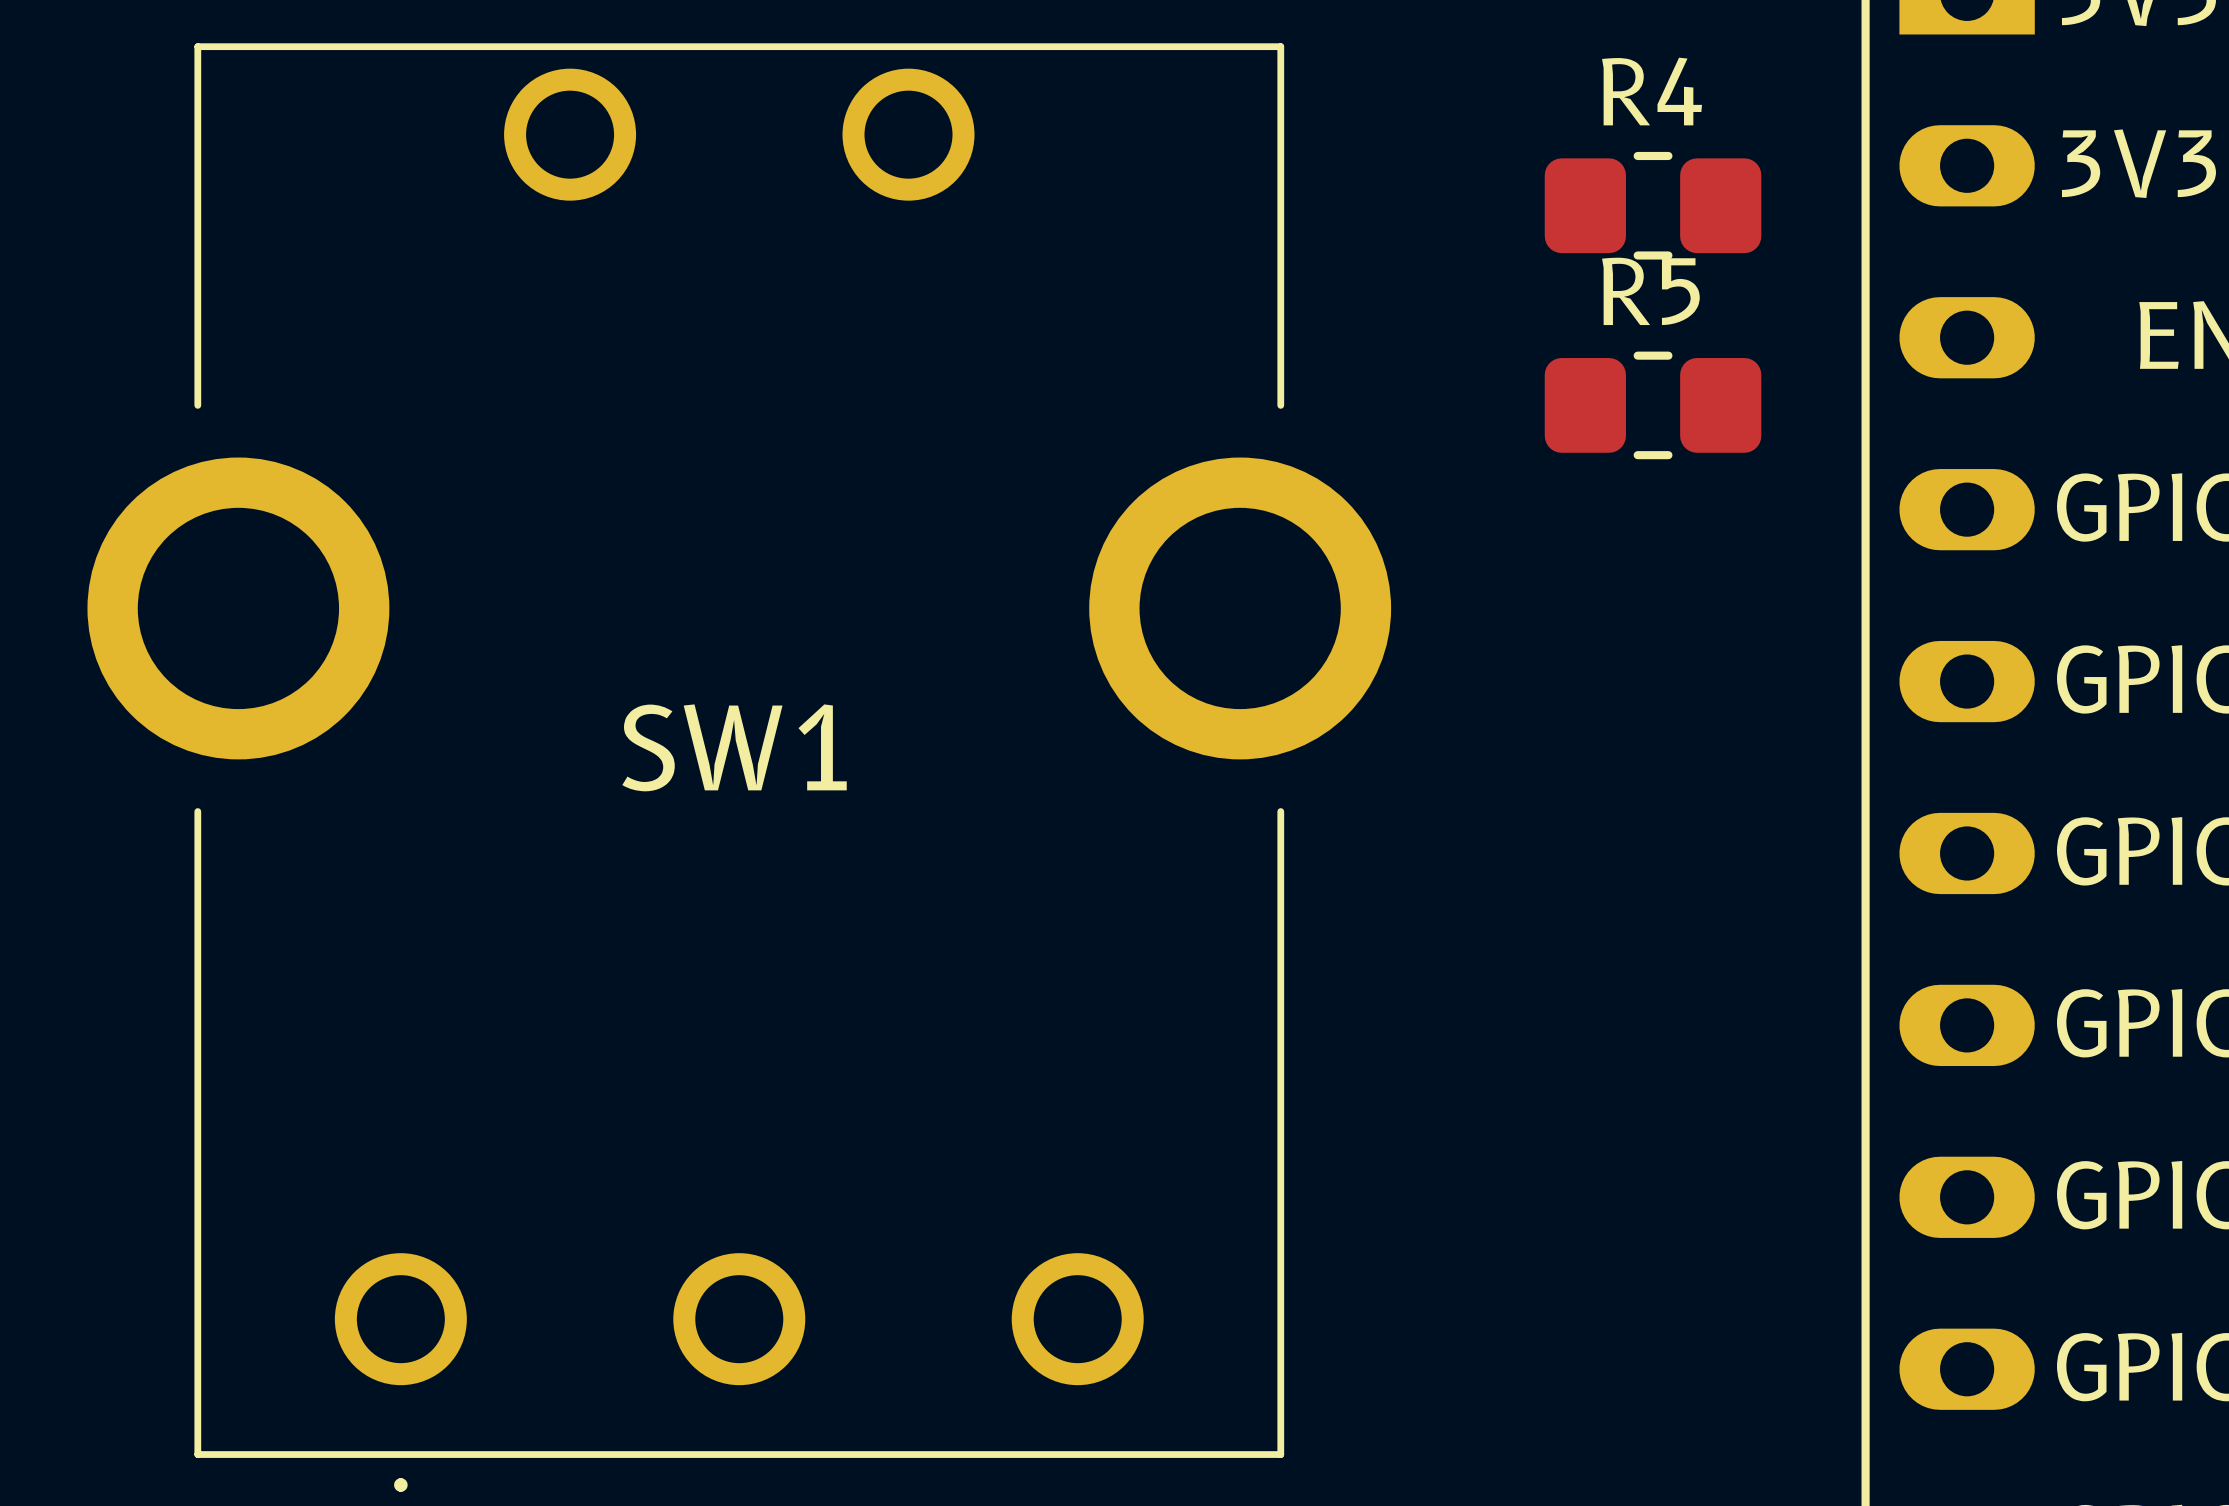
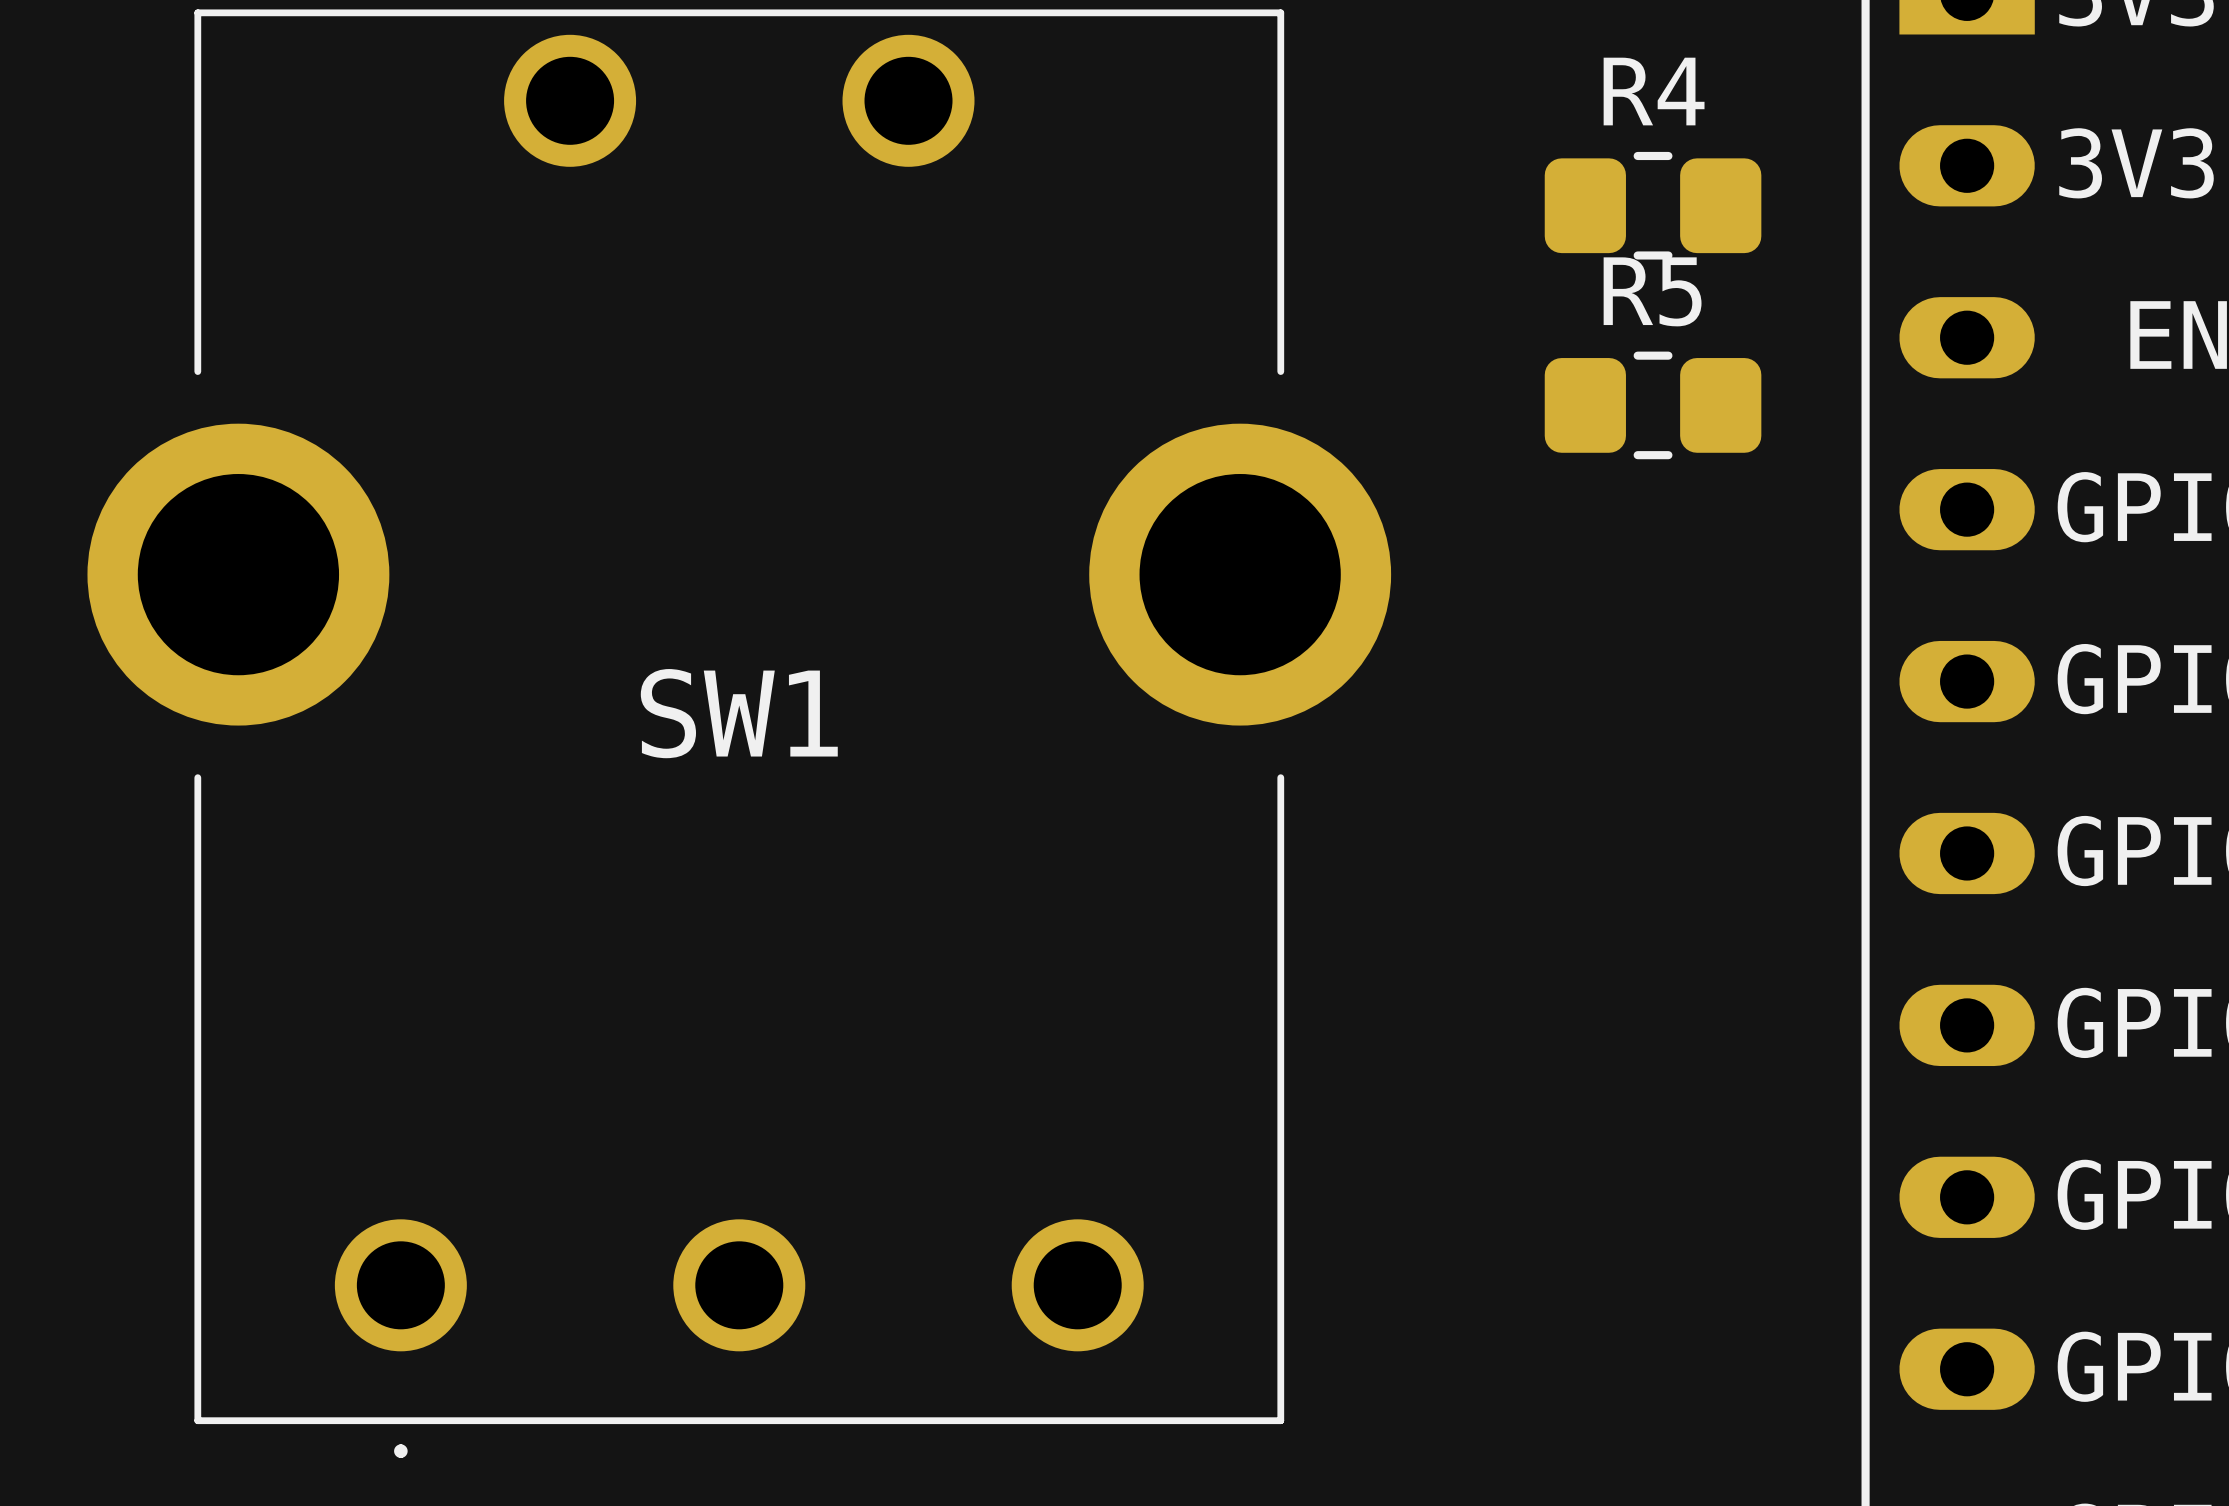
SW1 position: (739, 767) -> (739, 733)

